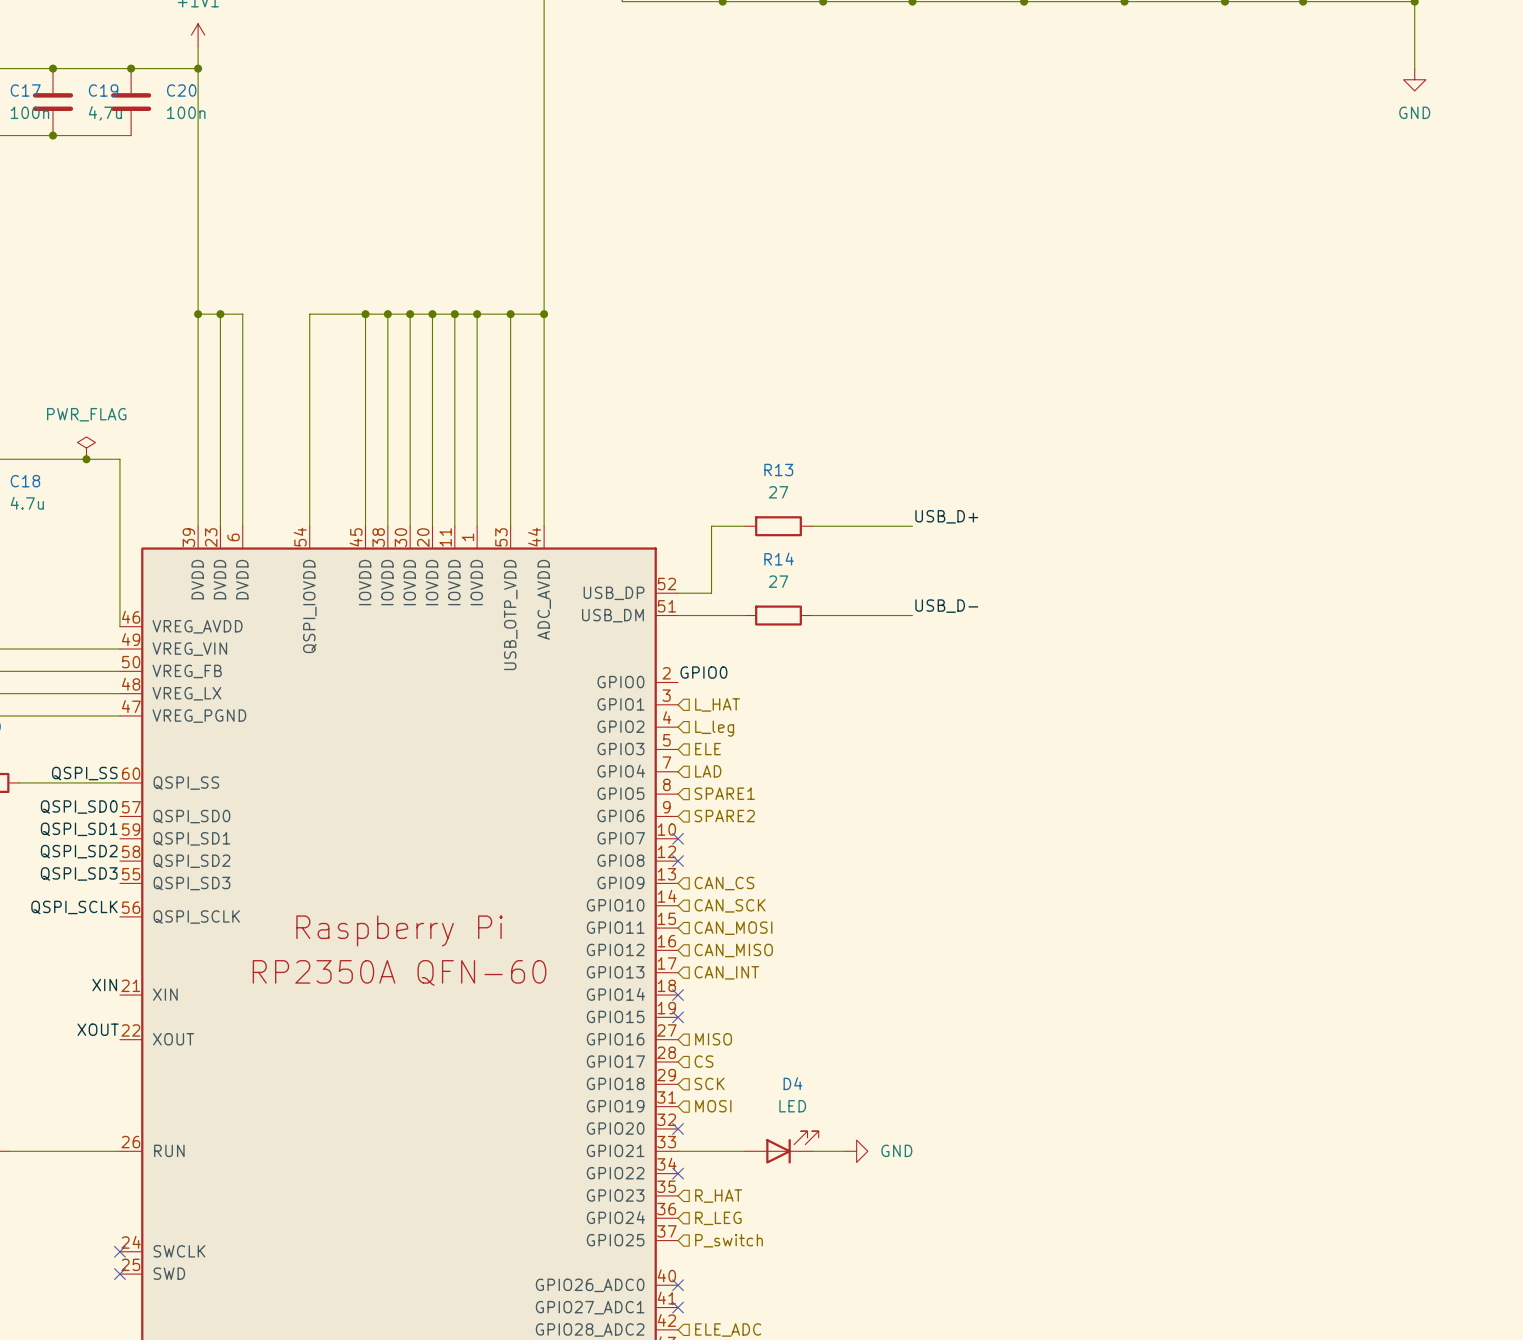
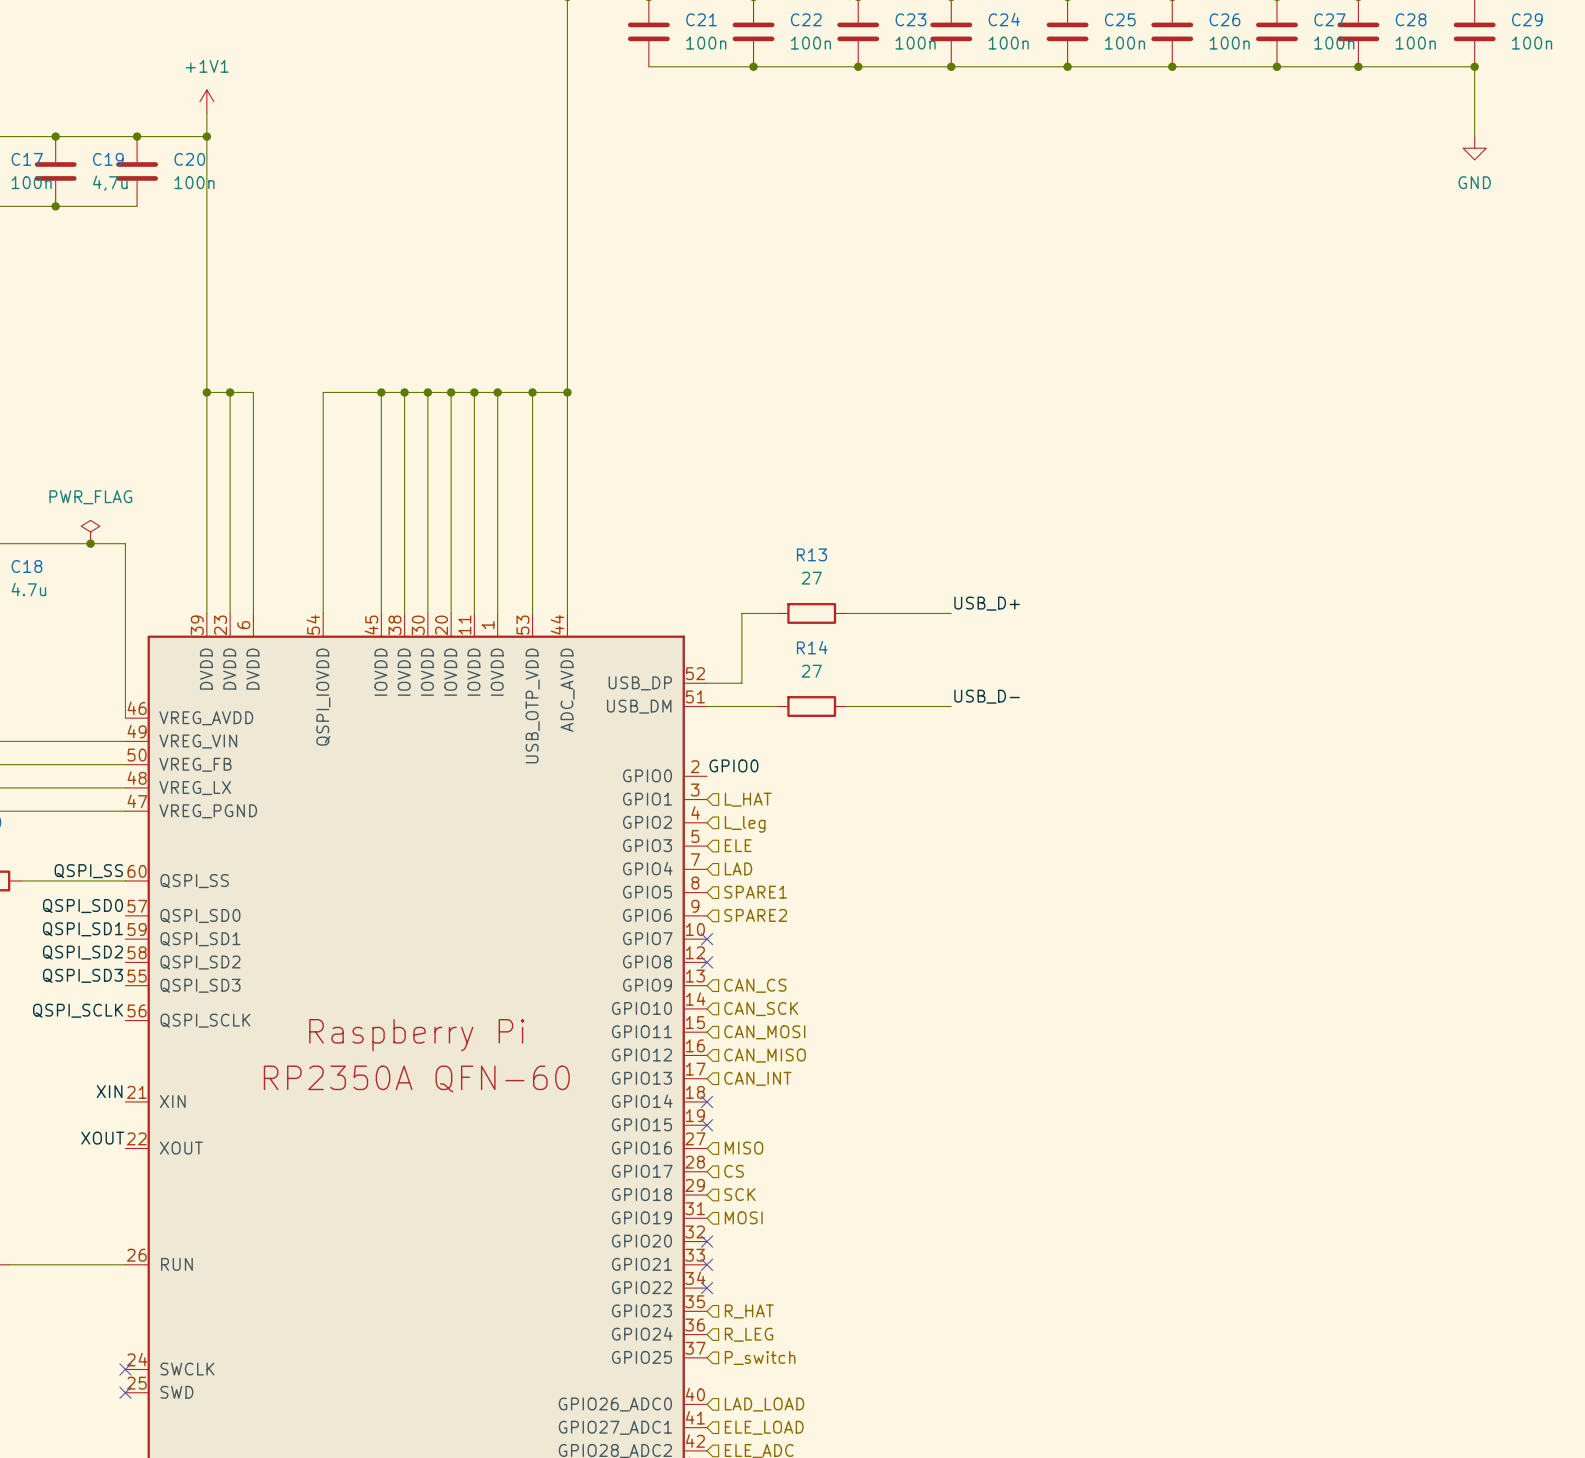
D4: LED (781, 1147) -> none
wire: (678, 1151) (745, 1151) -> none
no-connect mark: none -> (707, 1264)
wire: (811, 1151) (845, 1151) -> none
power symbol: GND (856, 1151) -> none
no-connect mark: (678, 1285) -> none
hierarchical label: none -> LAD_LOAD (764, 1404)
no-connect mark: (678, 1307) -> none
hierarchical label: none -> ELE_LOAD (764, 1427)

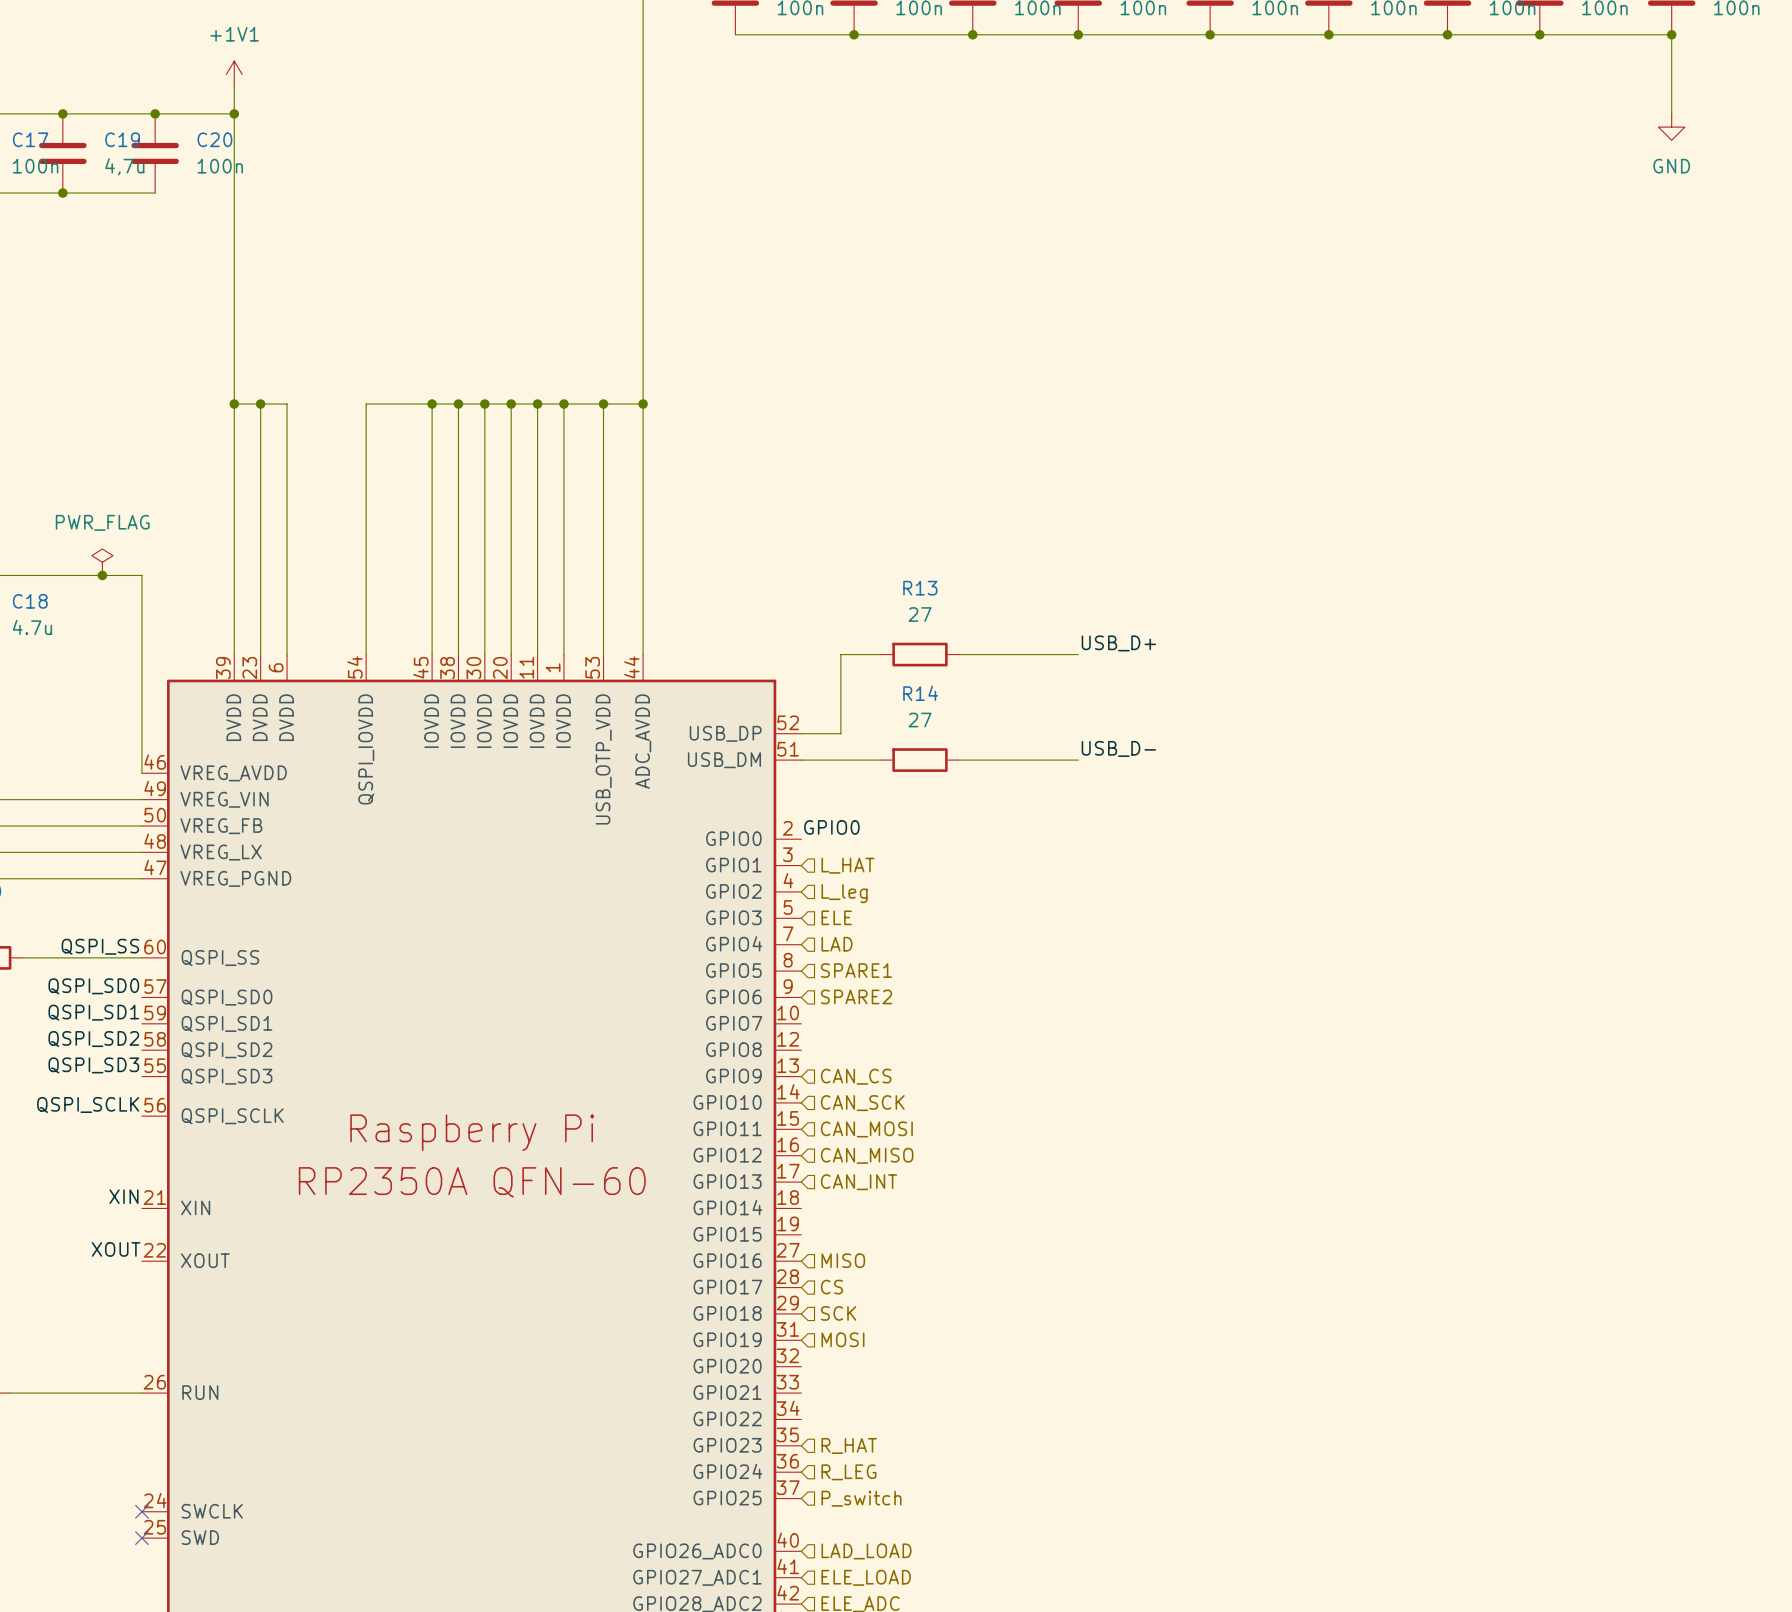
no-connect mark: (707, 939) -> none
no-connect mark: (707, 962) -> none
no-connect mark: (707, 1101) -> none
no-connect mark: (707, 1125) -> none
no-connect mark: (707, 1241) -> none
no-connect mark: (707, 1264) -> none
no-connect mark: (707, 1288) -> none

